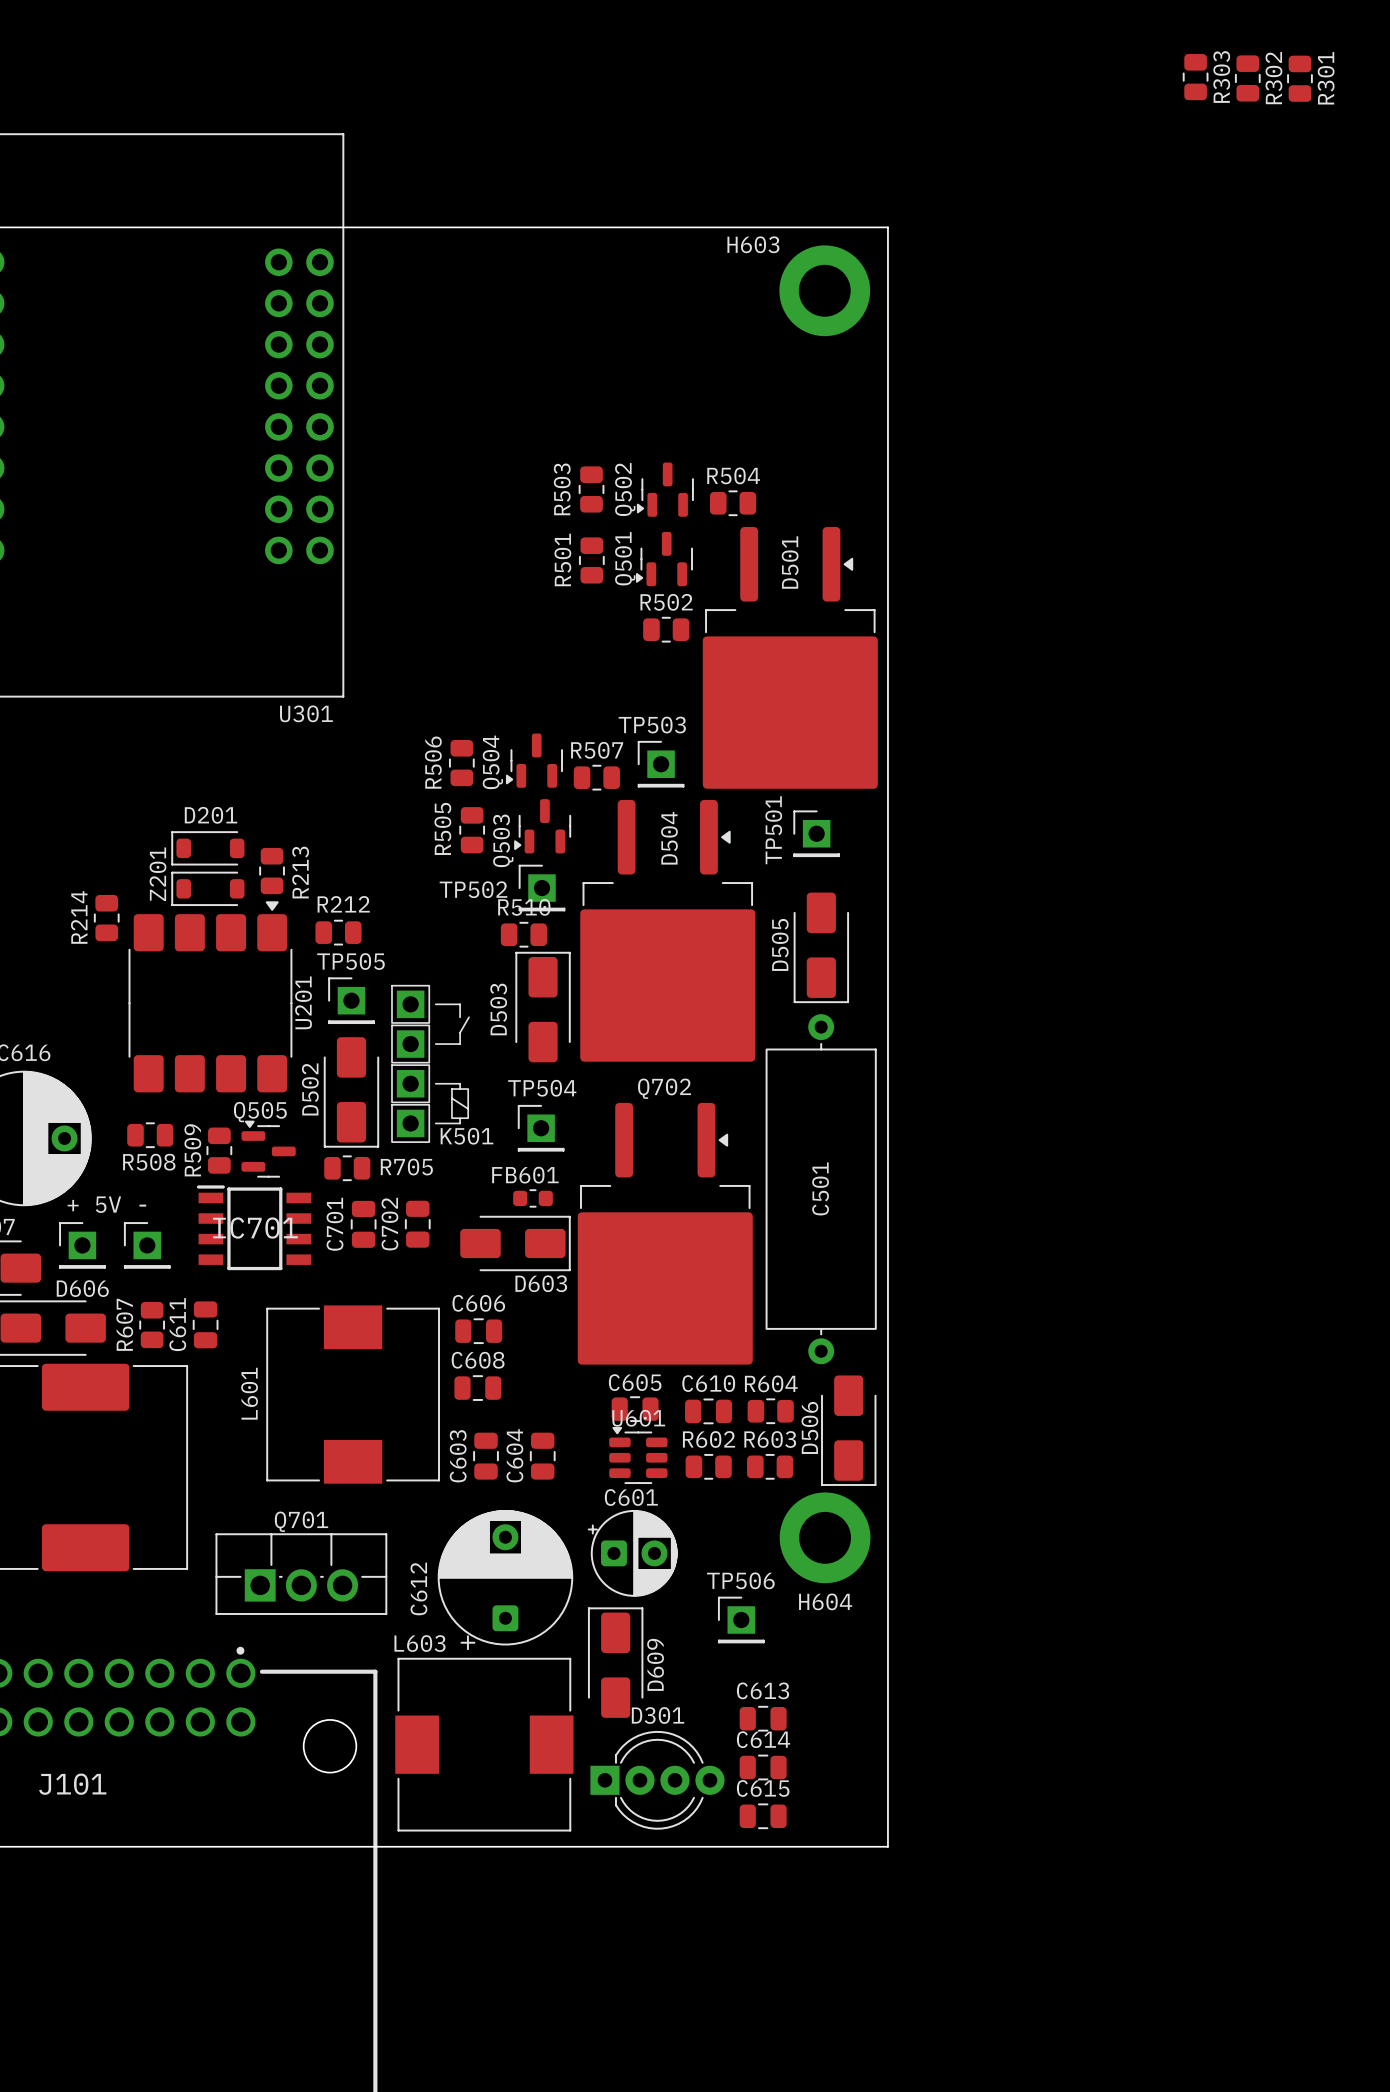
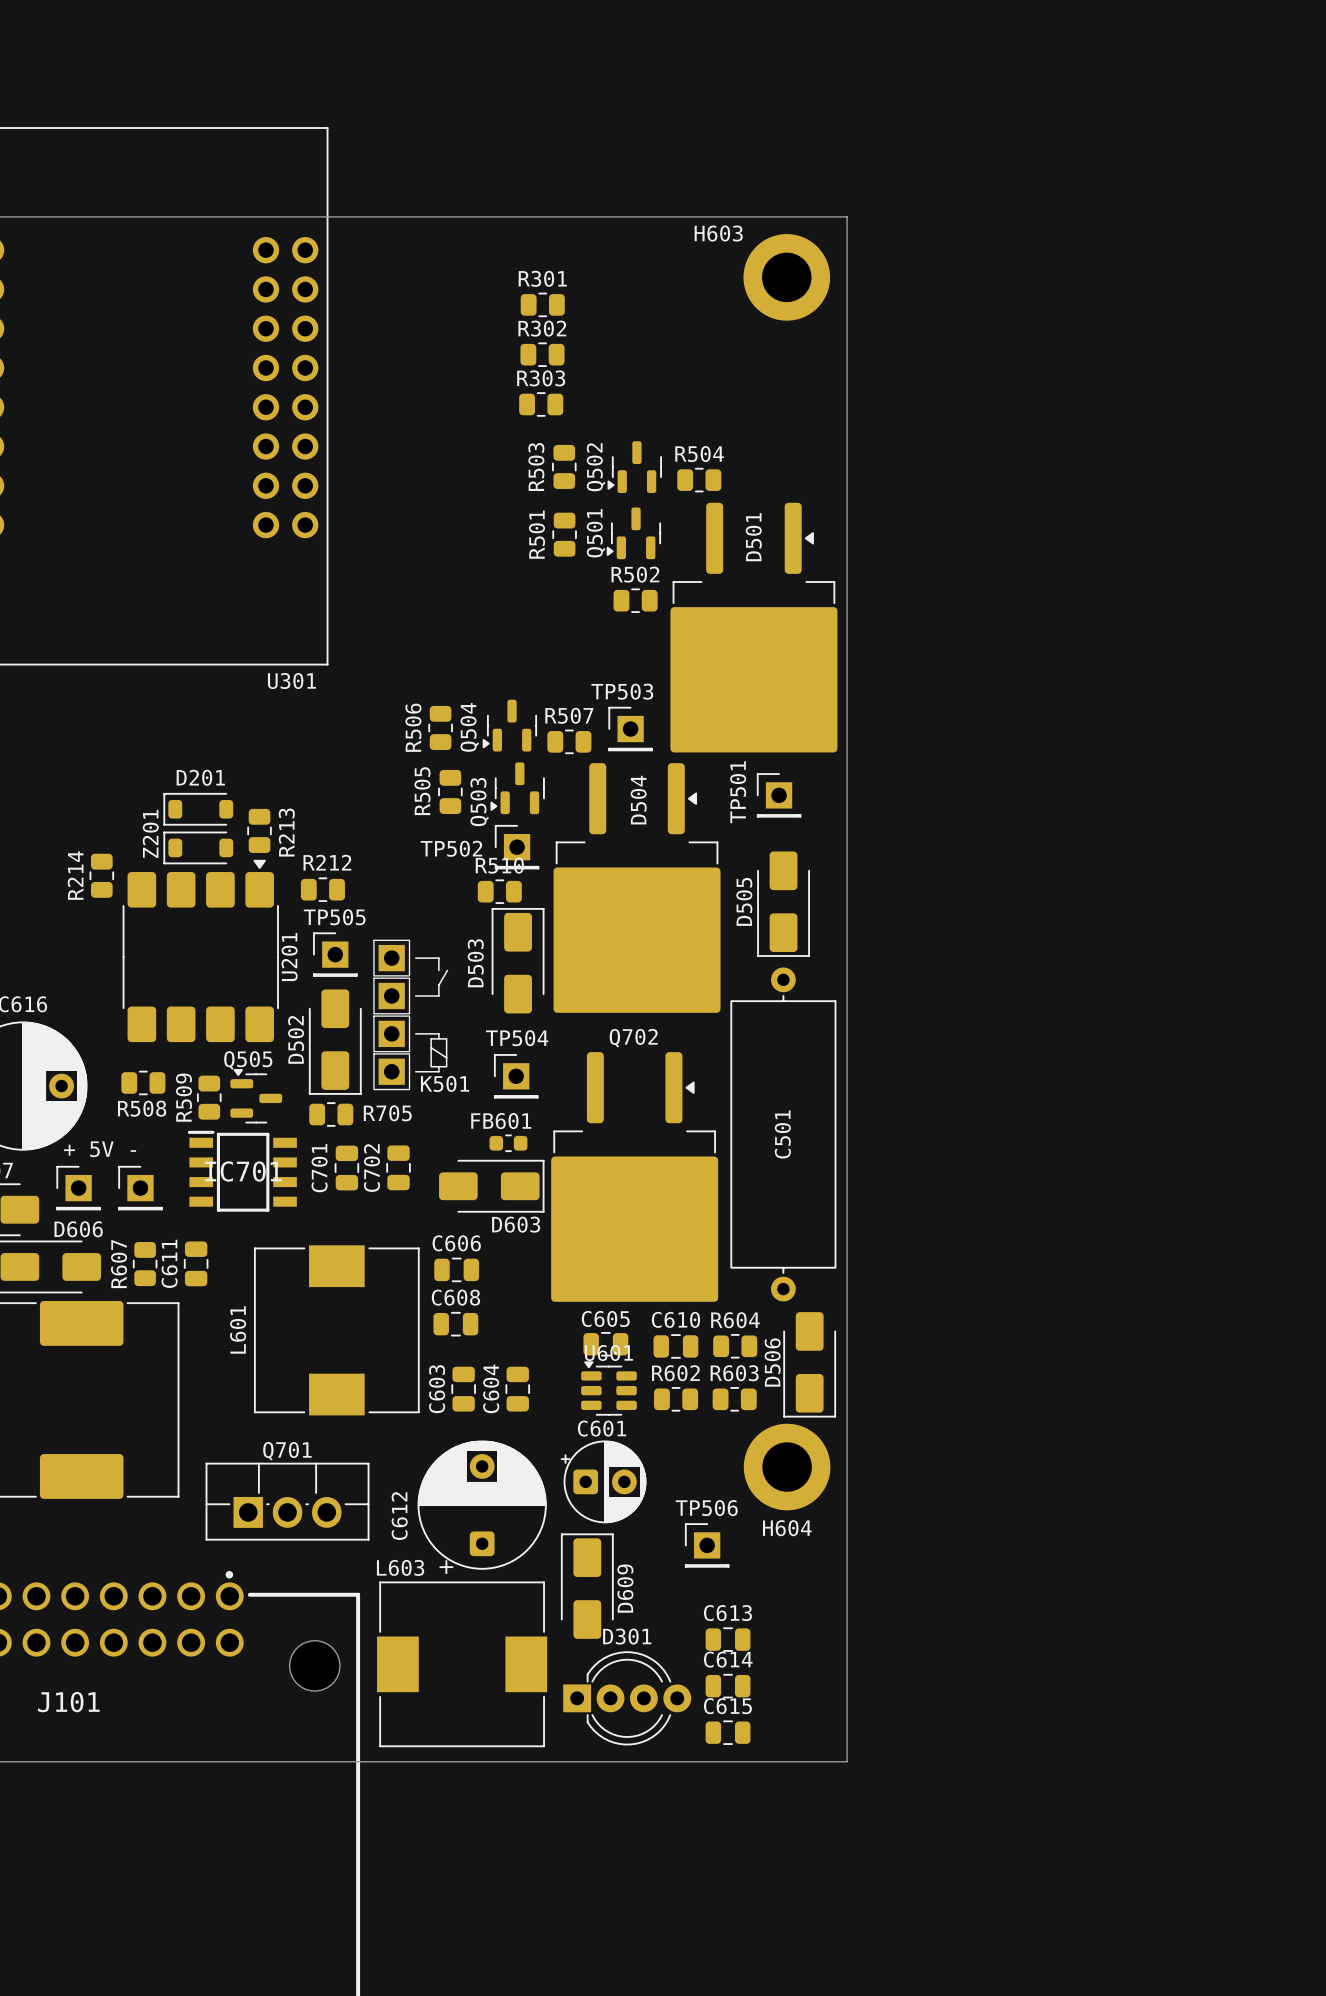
R303 rotation: 0° (1195, 77) -> 90° clockwise (541, 404)
R303 position: (1195, 77) -> (541, 404)
R303 name position: R303 (1221, 77) -> R303 (541, 378)
R302 rotation: 0° (1247, 78) -> 90° clockwise (542, 354)
R302 position: (1247, 78) -> (542, 354)
R302 name position: R302 (1273, 78) -> R302 (542, 328)
R301 rotation: 0° (1299, 78) -> 90° clockwise (542, 304)
R301 position: (1299, 78) -> (542, 304)
R301 name position: R301 (1326, 78) -> R301 (542, 278)

